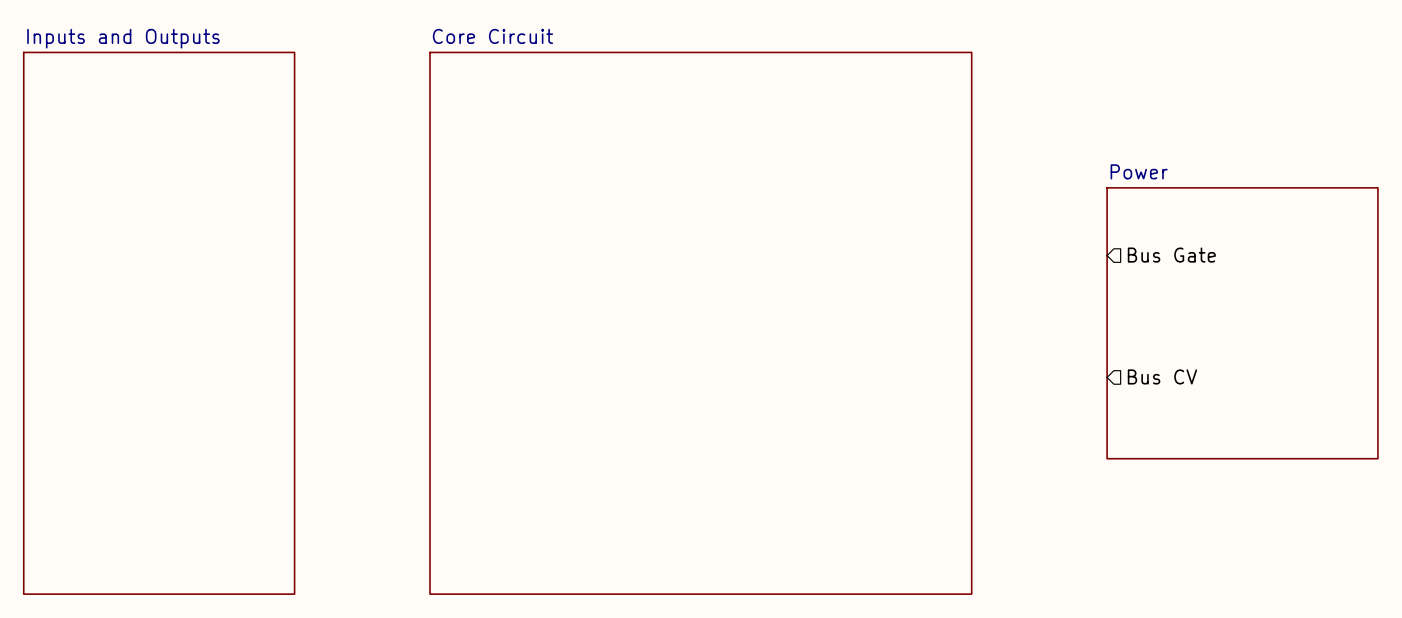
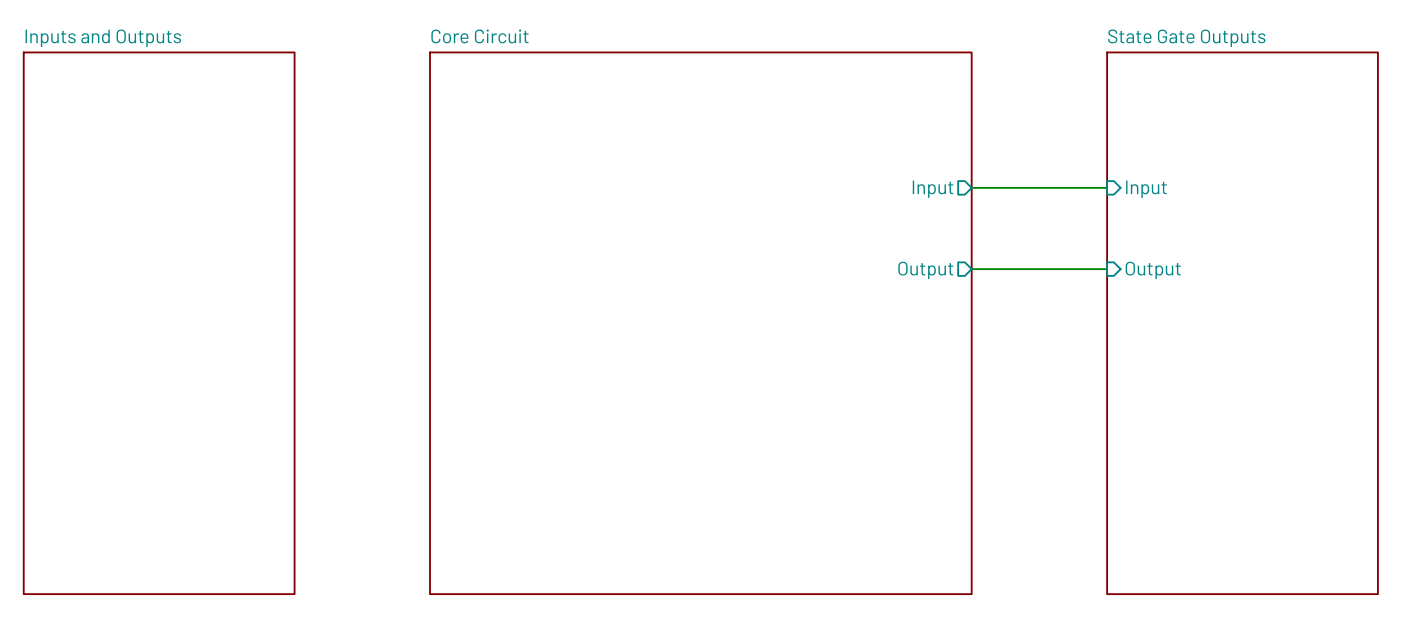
wire: none -> (971, 187) (1107, 187)
sheet pin: none -> Input (933, 189)
sheet pin: none -> Input (1146, 189)
sheet pin: Bus Gate (1171, 255) -> none
wire: none -> (971, 269) (1107, 269)
sheet pin: none -> Output (925, 270)
sheet pin: none -> Output (1153, 270)
sheet Power: (1242, 323) -> none
sheet State Gate Outputs: none -> (1242, 323)
sheet pin: Bus CV (1162, 376) -> none

